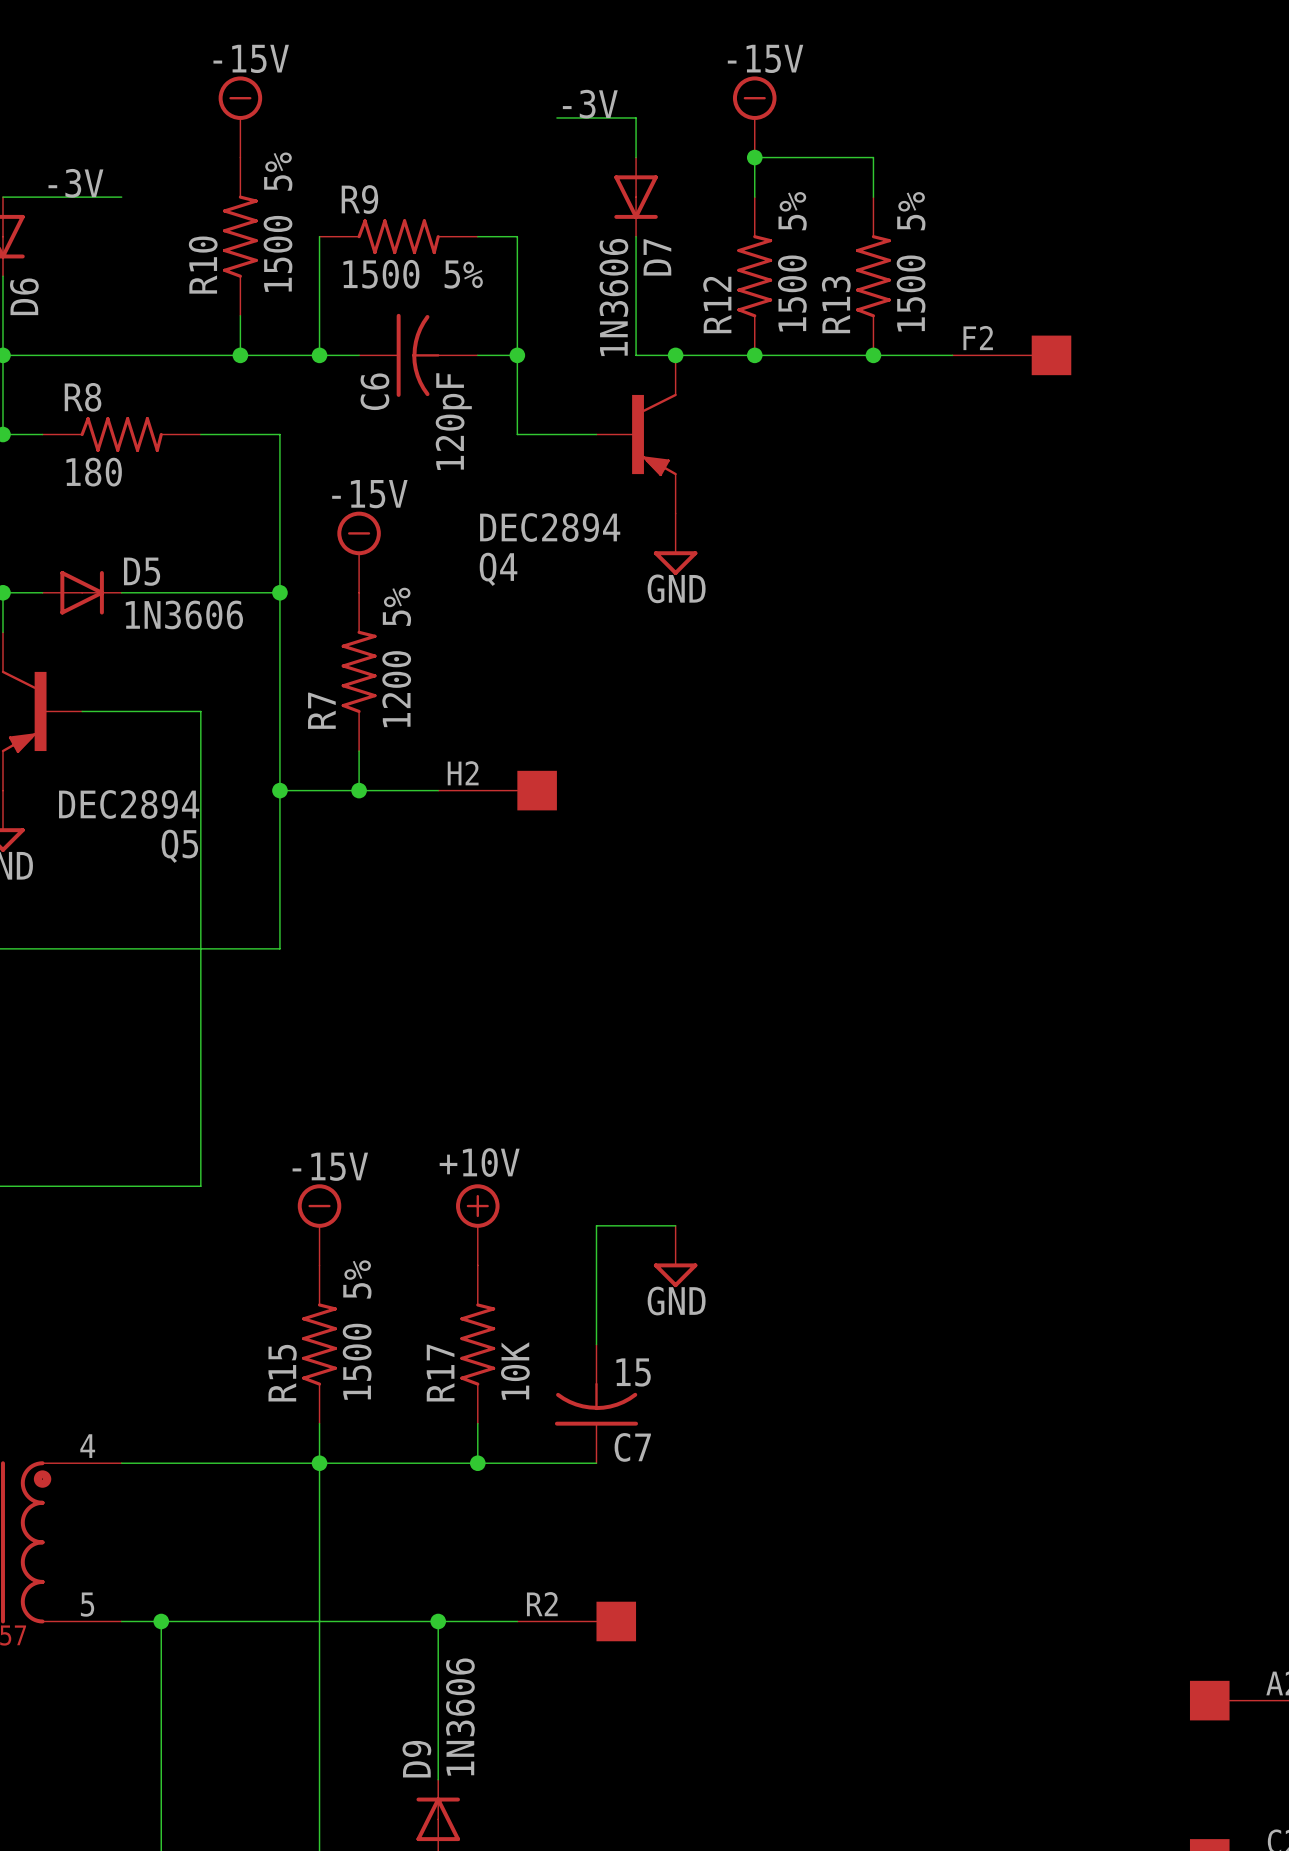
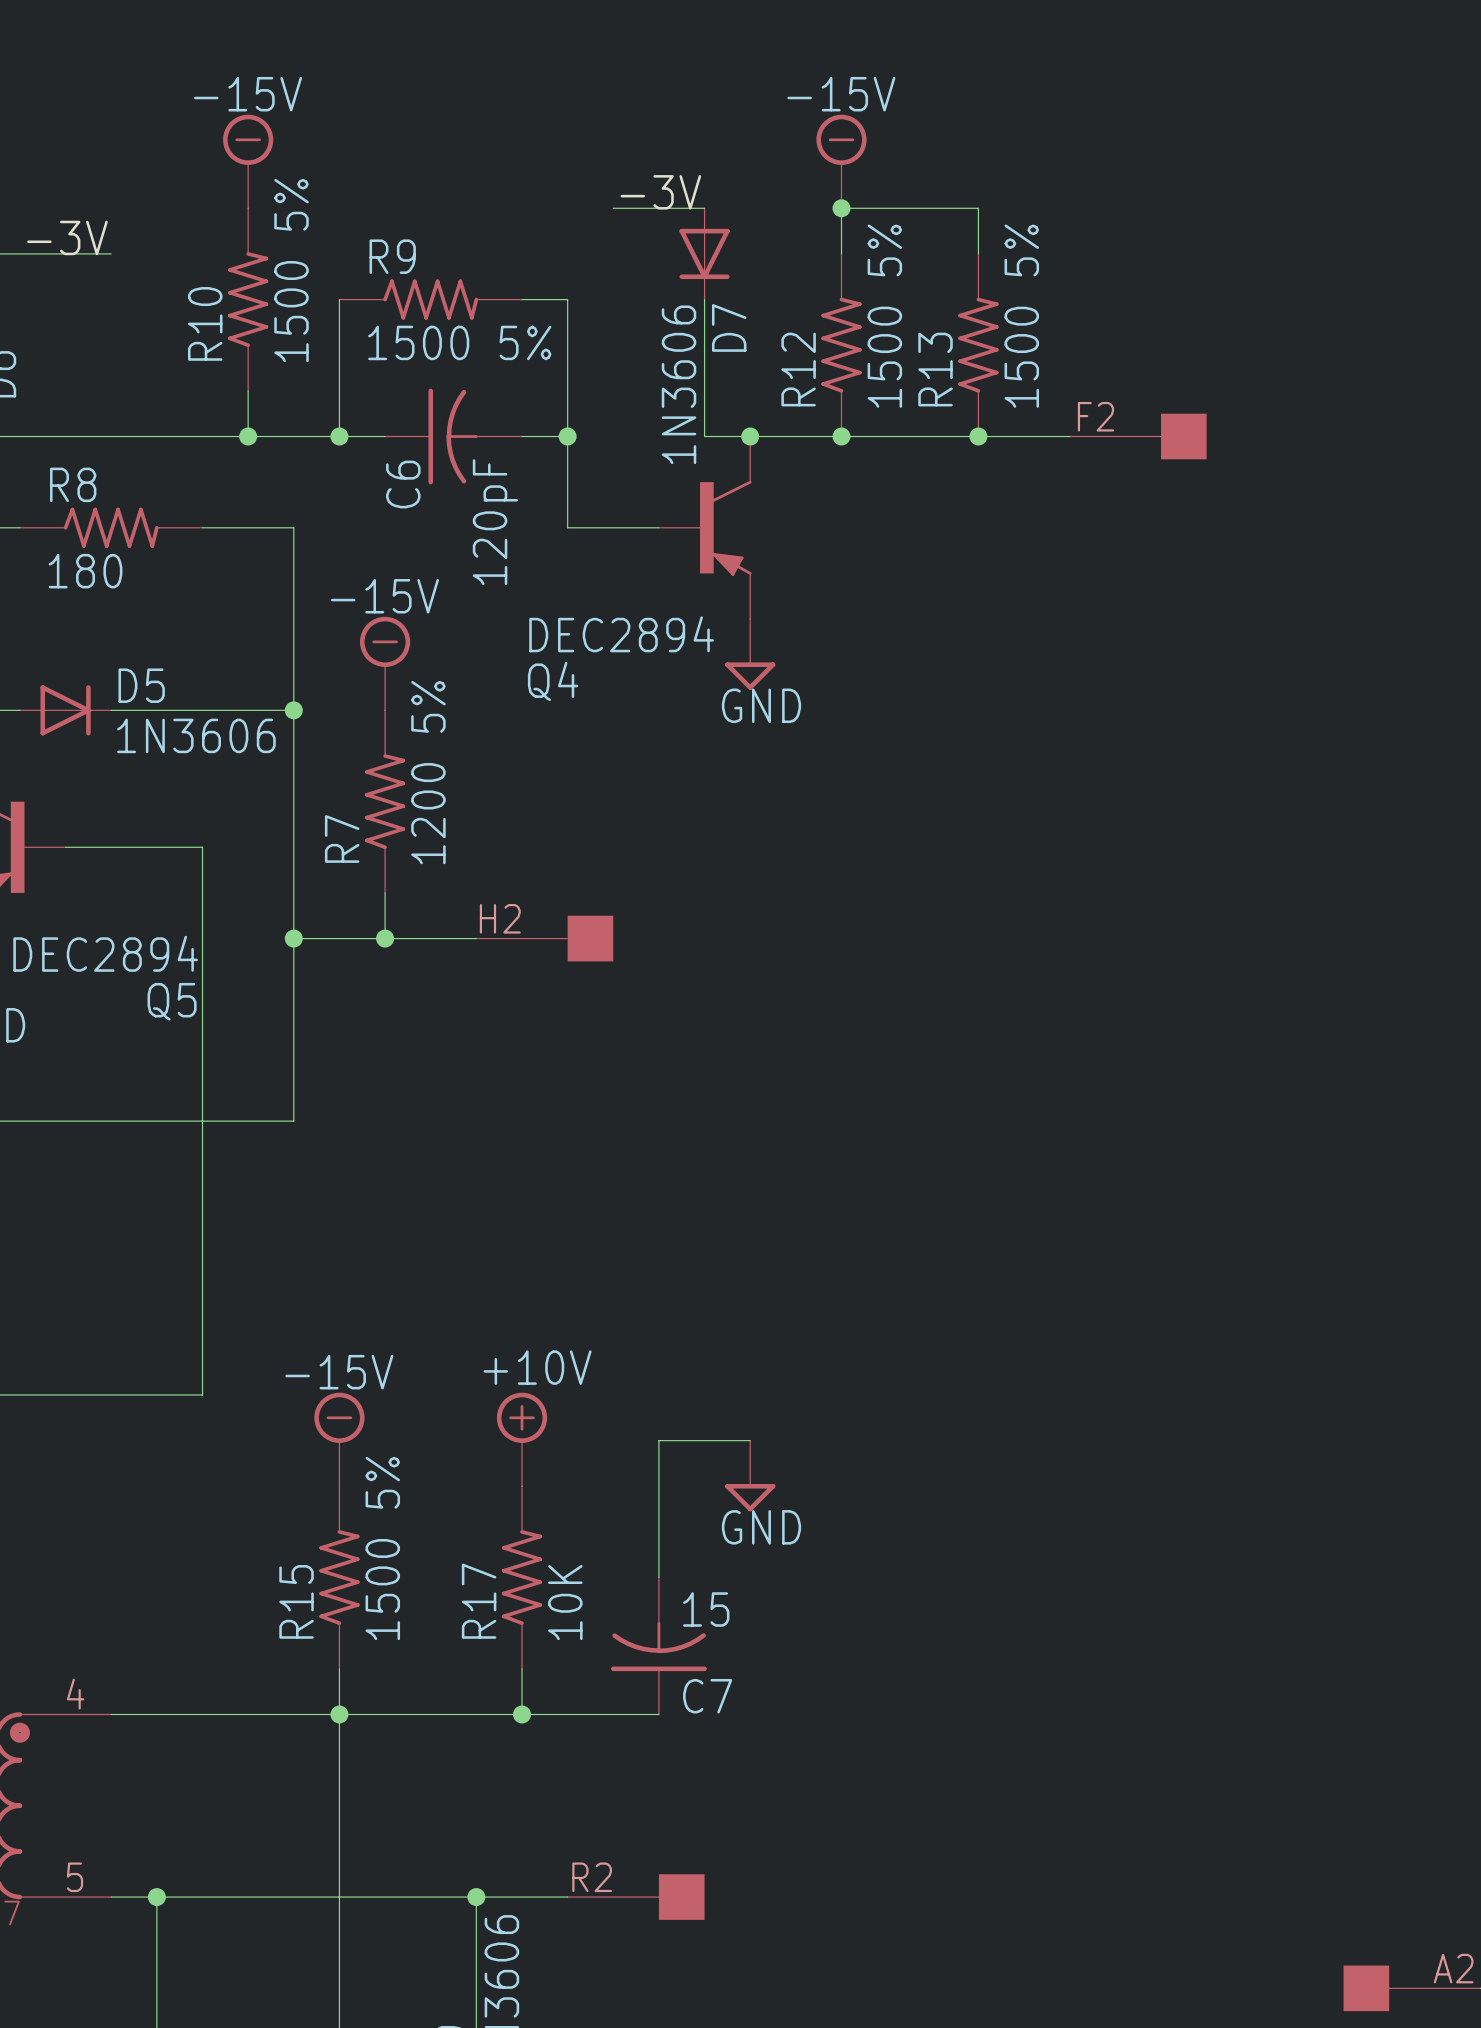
label position: -3V (590, 104) -> -3V (660, 192)
wire: (556, 117) (636, 117) (636, 157) -> (613, 208) (704, 208)

